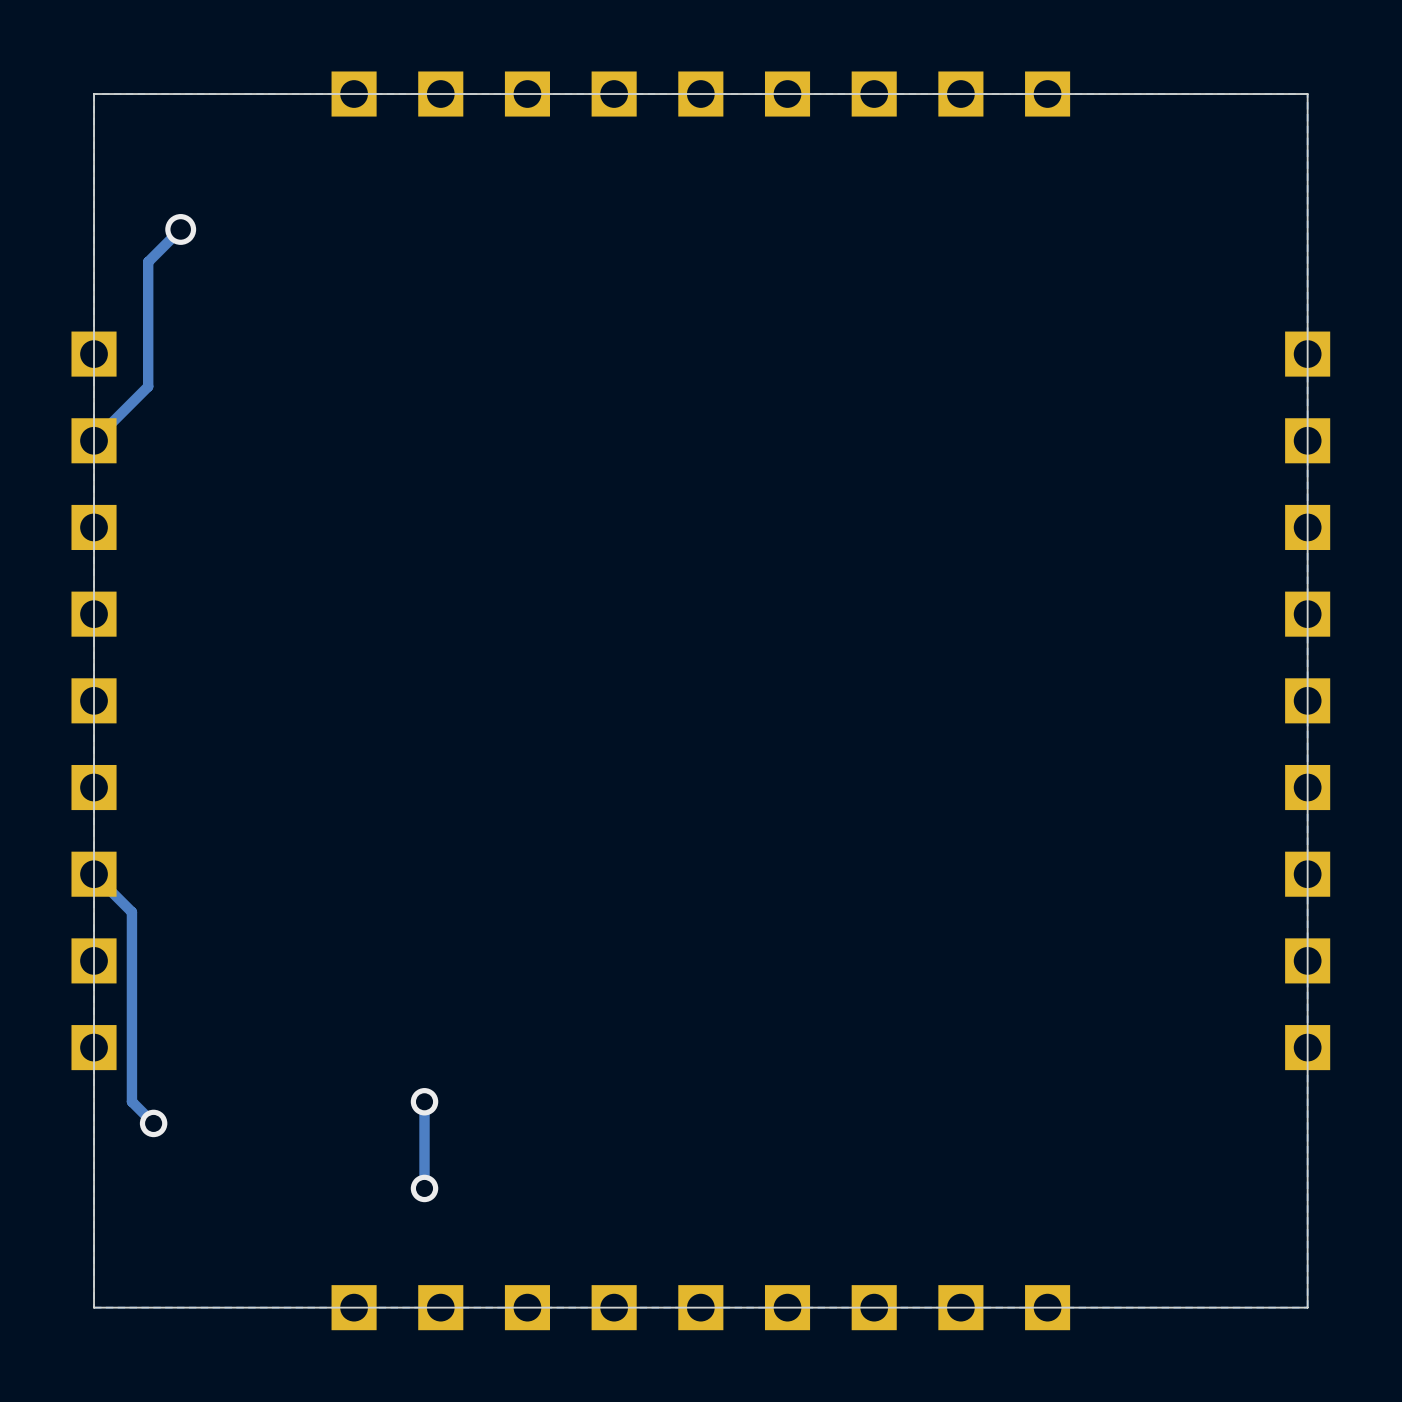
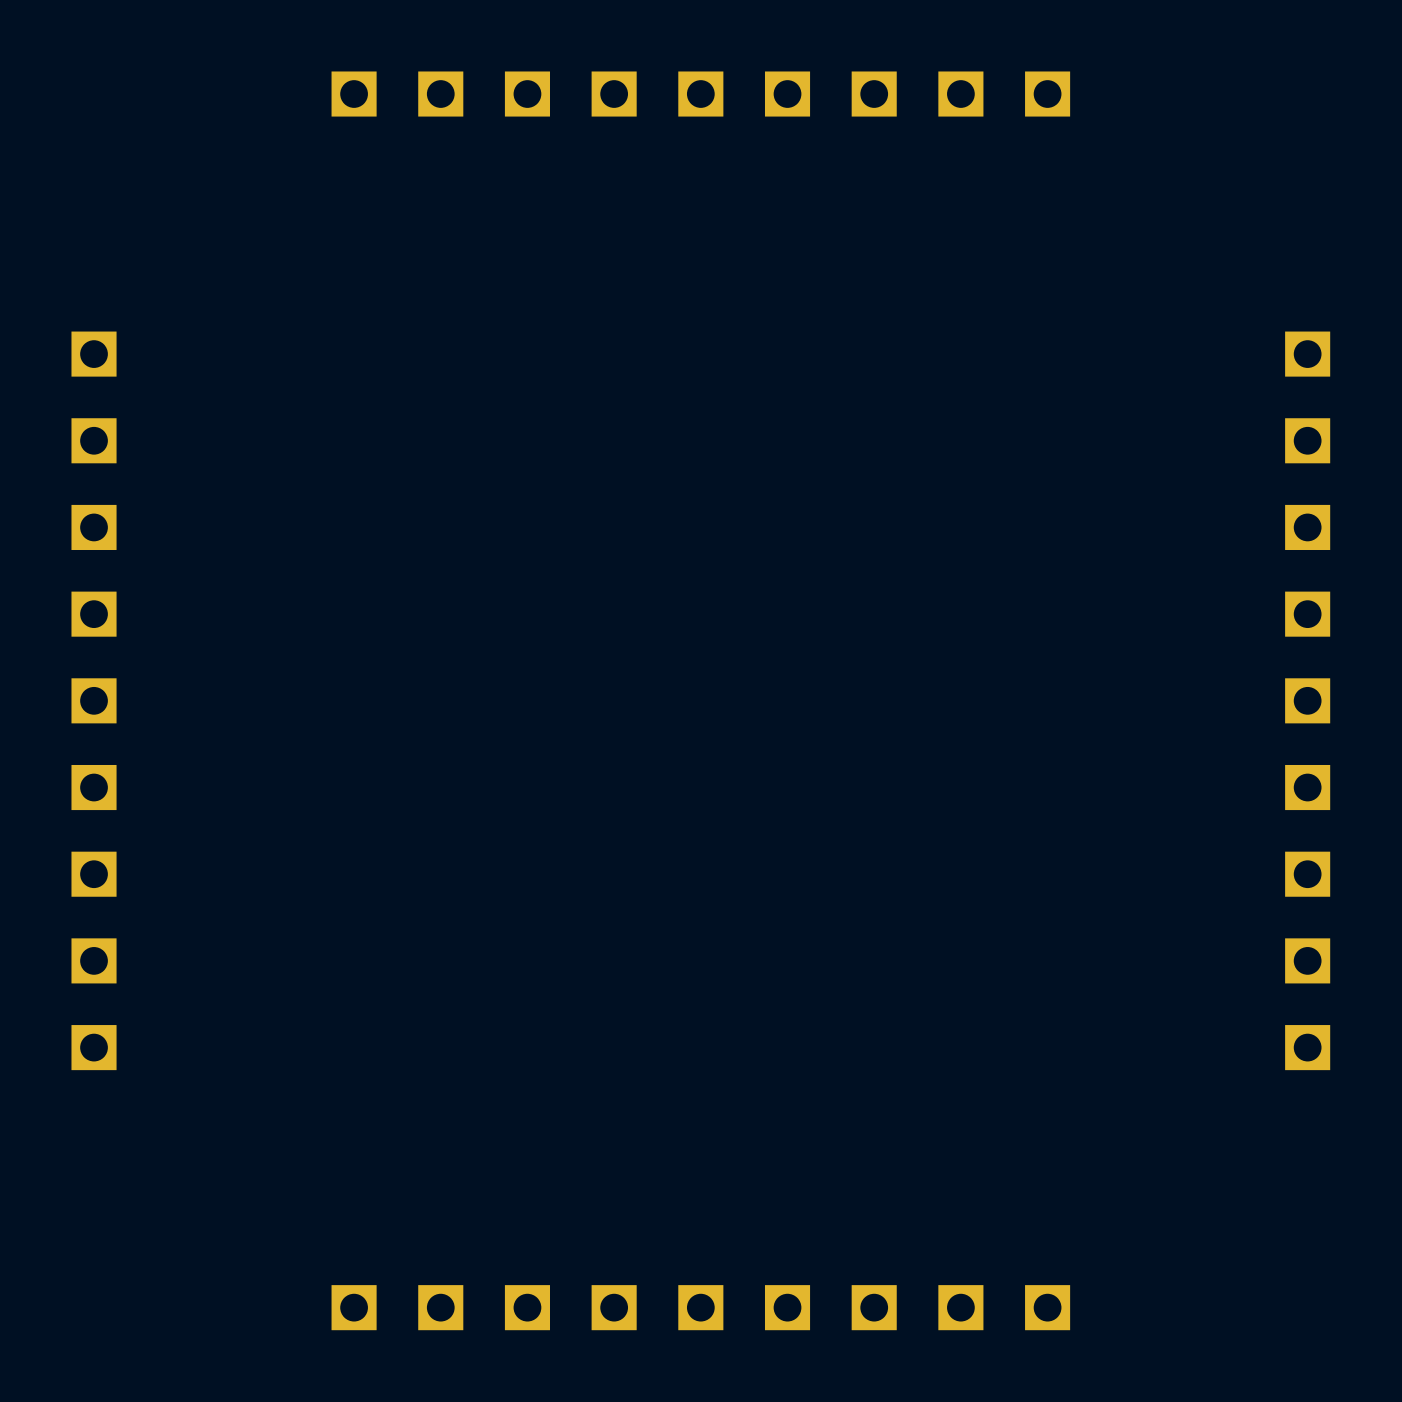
board edge: (1307, 94) (1307, 1307) (94, 1307) (94, 94) (1307, 94) -> none
track: (180, 229) (148, 261) (148, 386) (94, 440) -> none
via: (180, 229) -> none
track: (94, 874) (131, 912) (131, 1101) (153, 1123) -> none
track: (424, 1101) (424, 1188) -> none
via: (424, 1101) -> none
via: (153, 1123) -> none
via: (424, 1188) -> none

